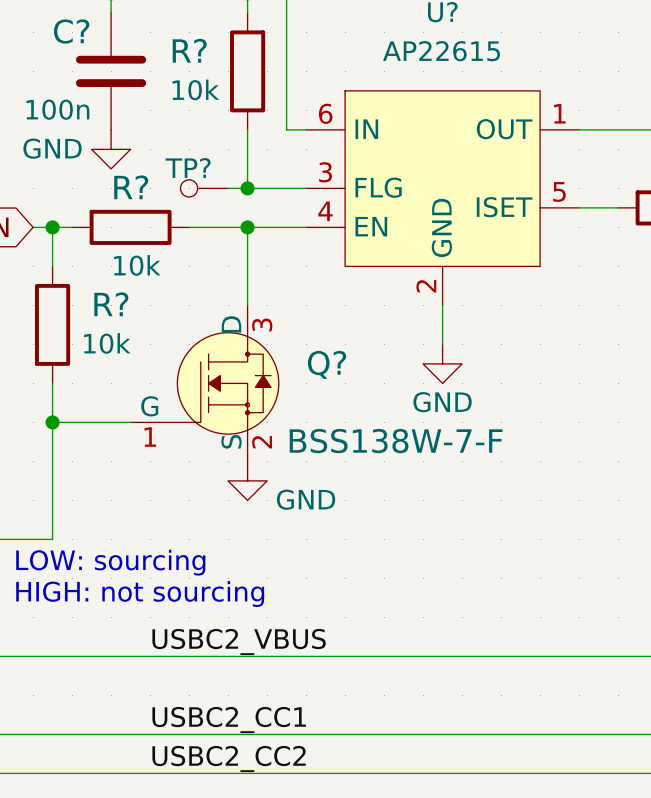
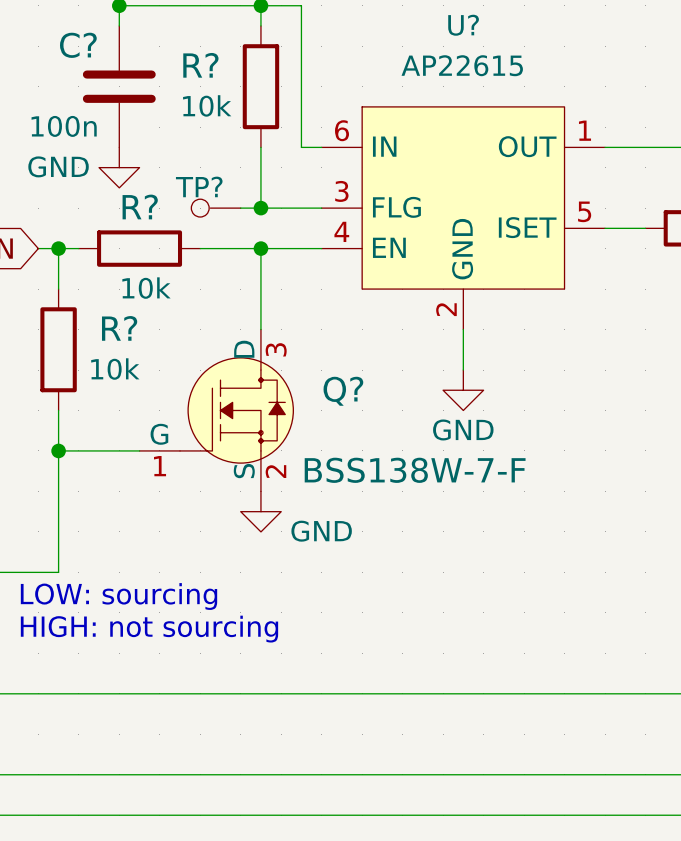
label: USBC2_VBUS (239, 641) -> none
label: USBC2_CC1 (229, 719) -> none
label: USBC2_CC2 (229, 758) -> none

